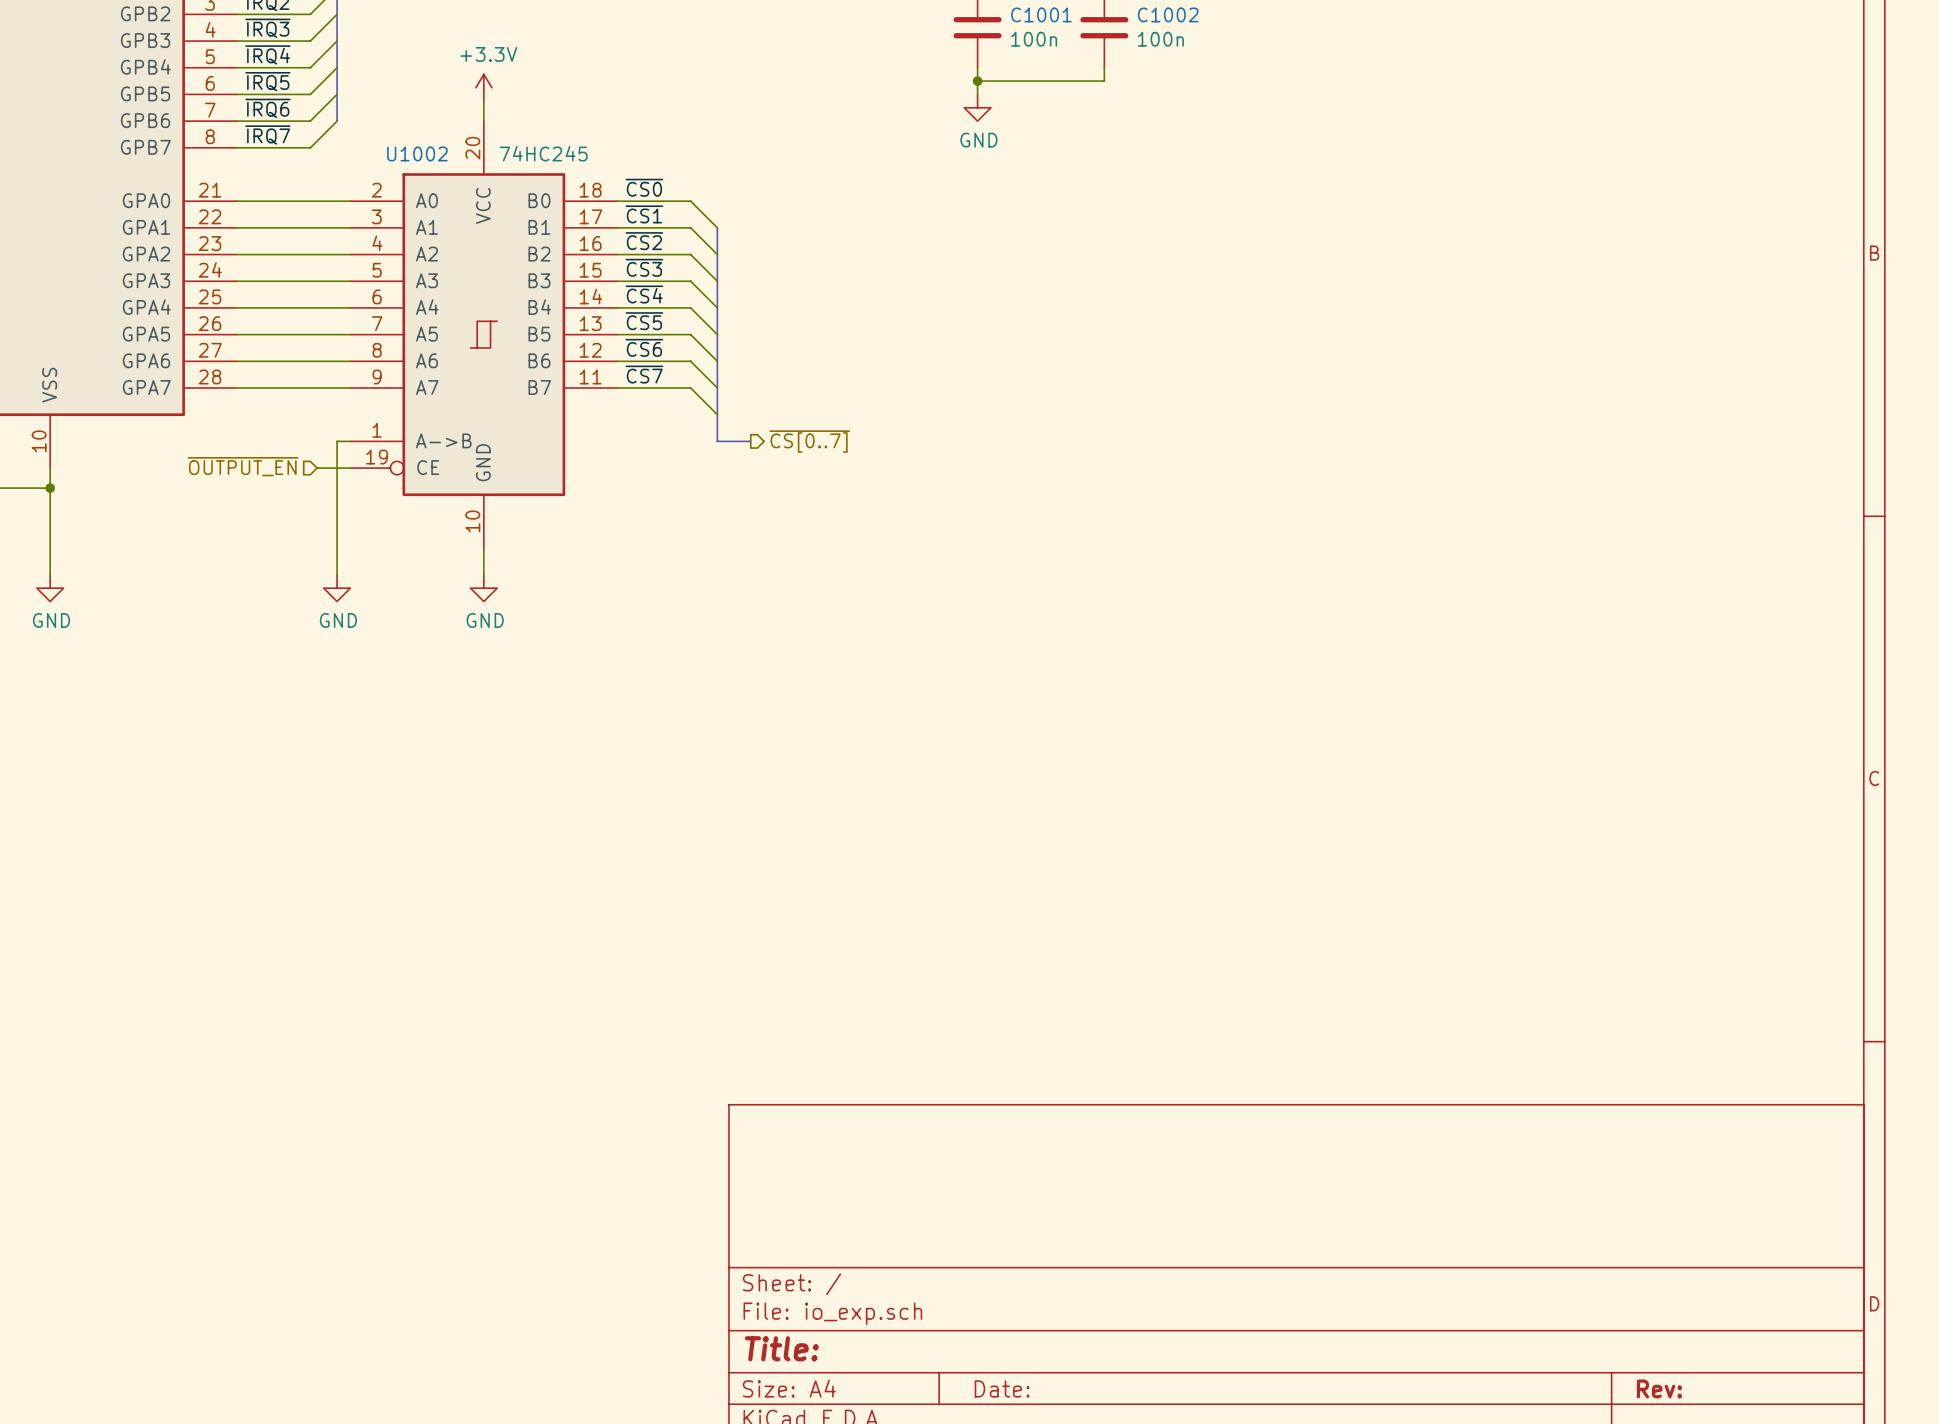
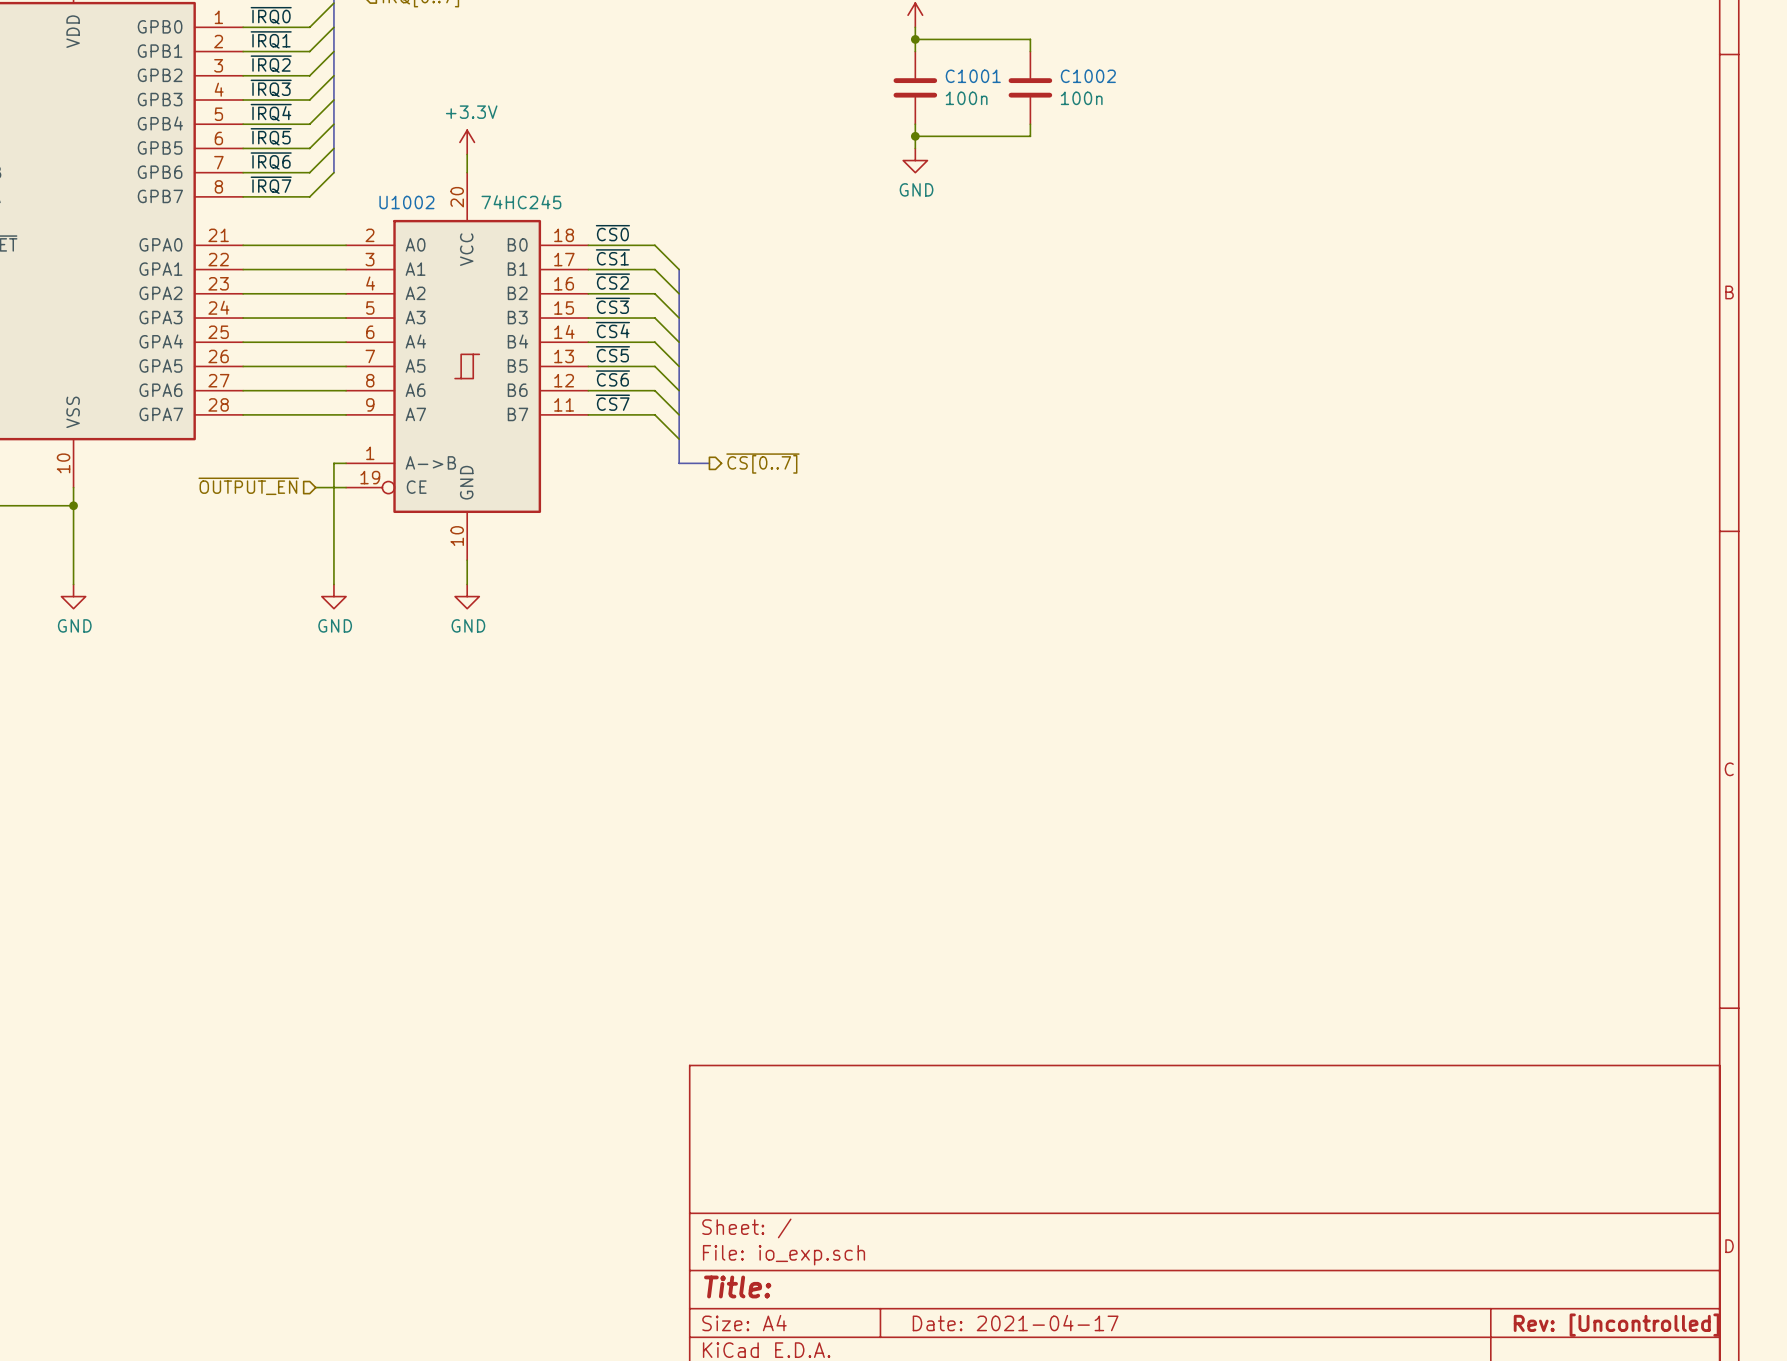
title block: Date: (1002, 1388) -> Date: 2021-04-17 (1015, 1323)
title block: Rev: (1659, 1388) -> Rev: [Uncontrolled] (1616, 1325)

